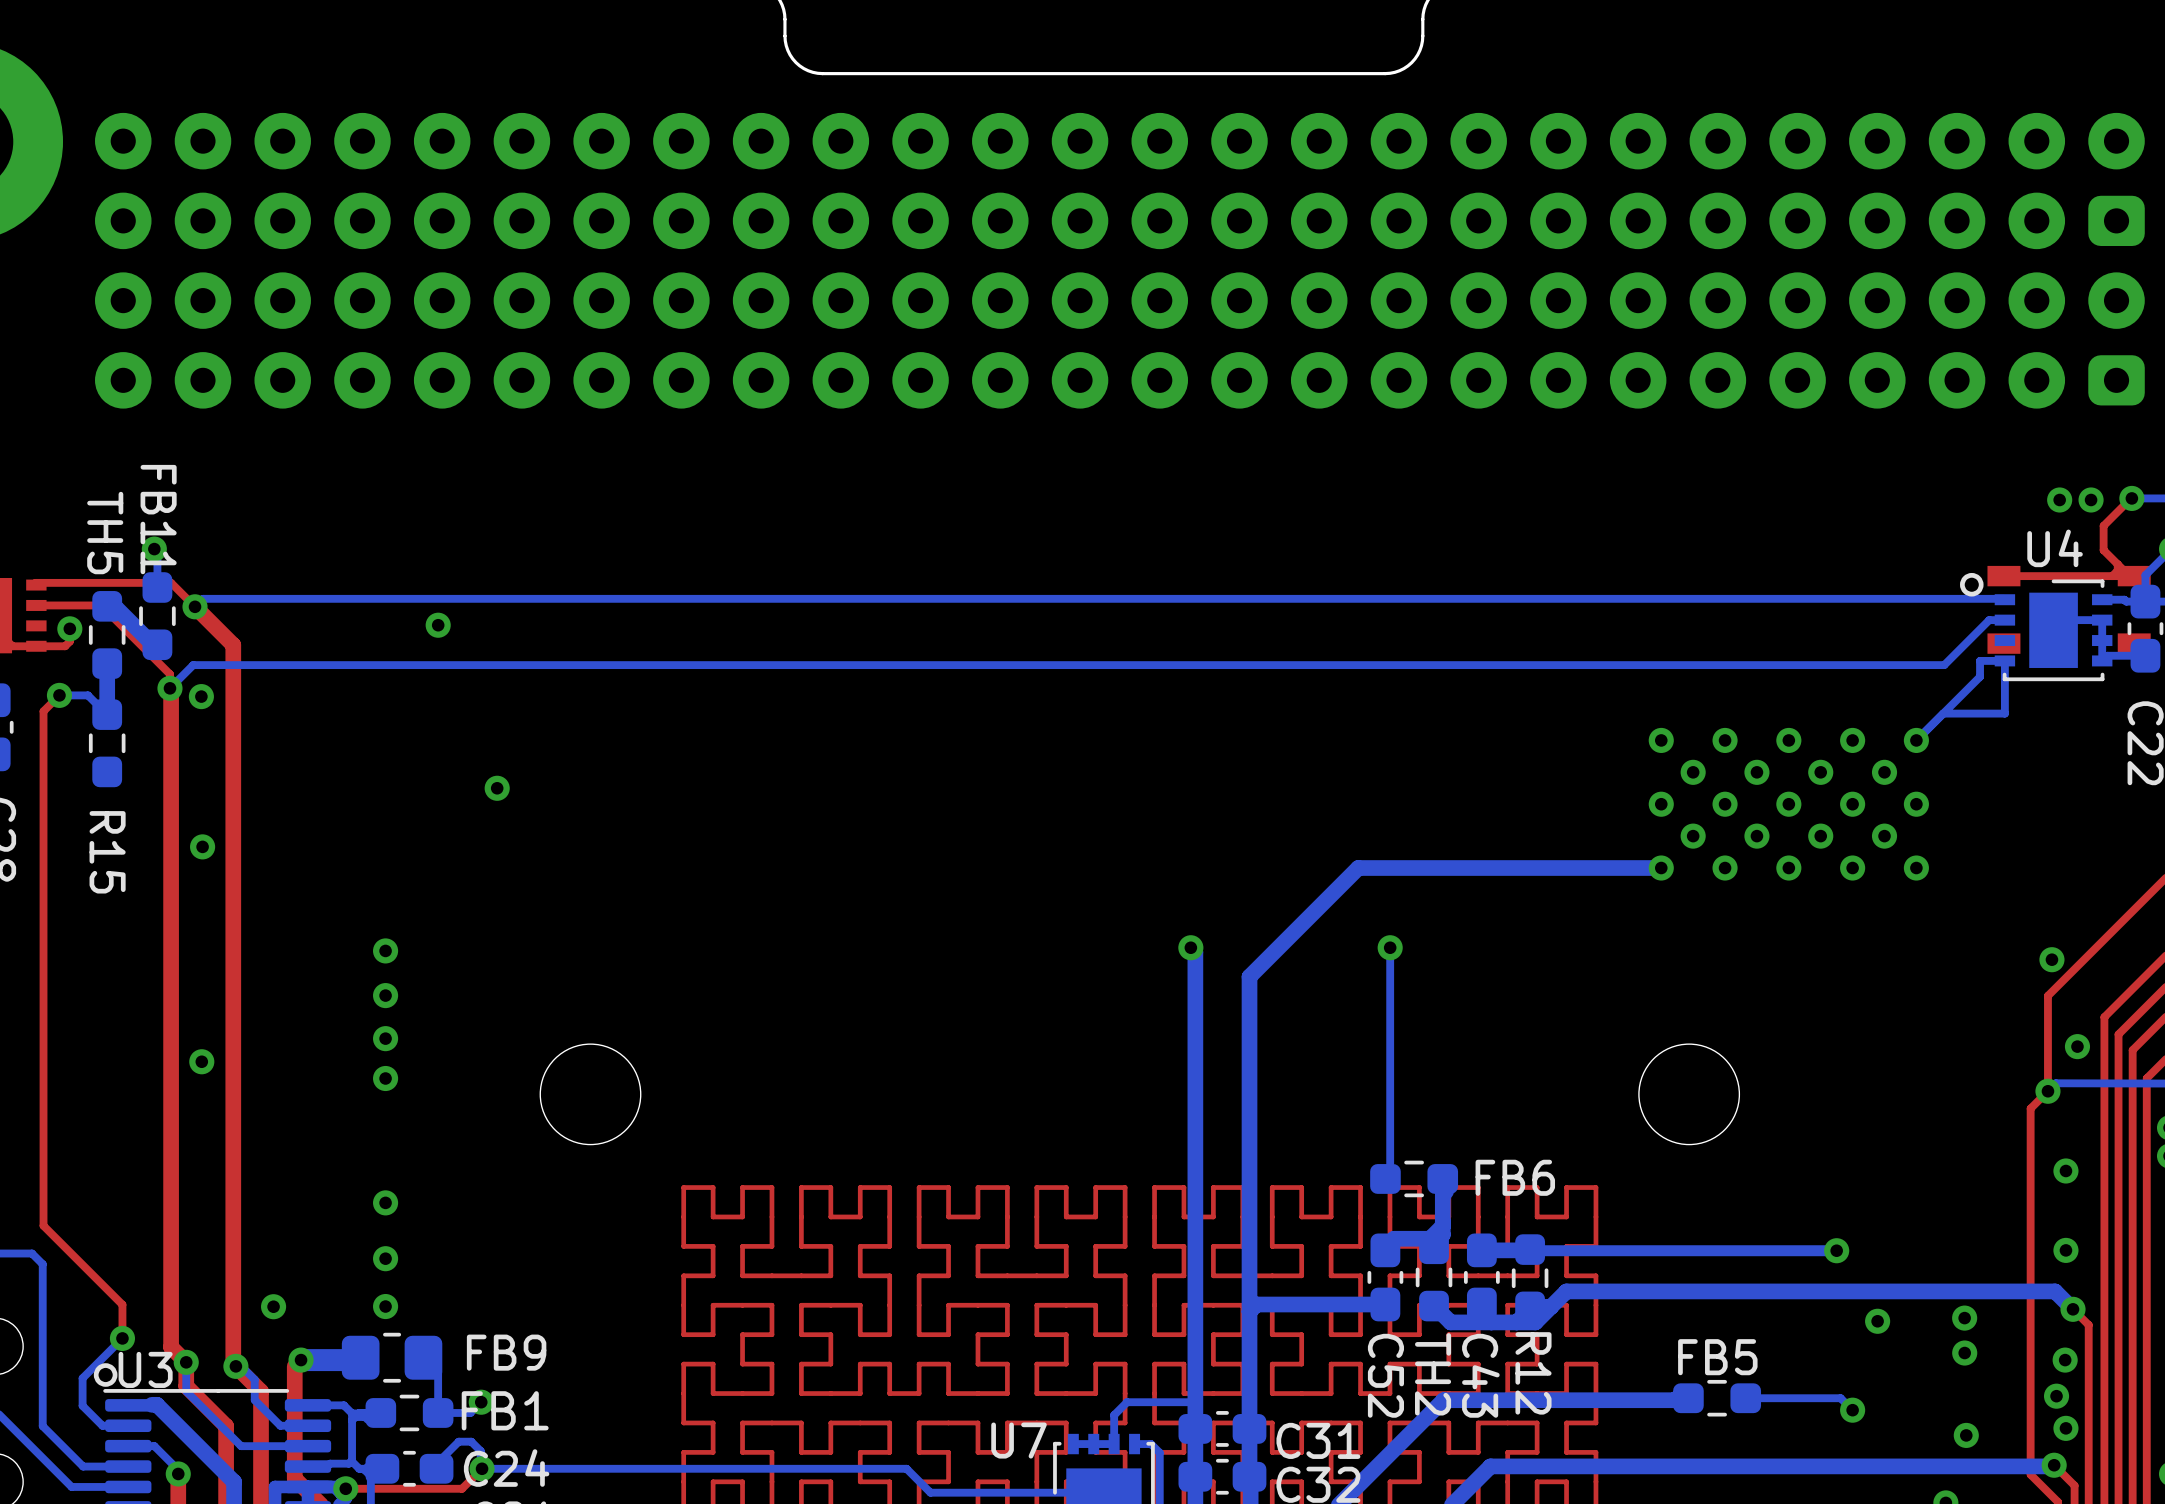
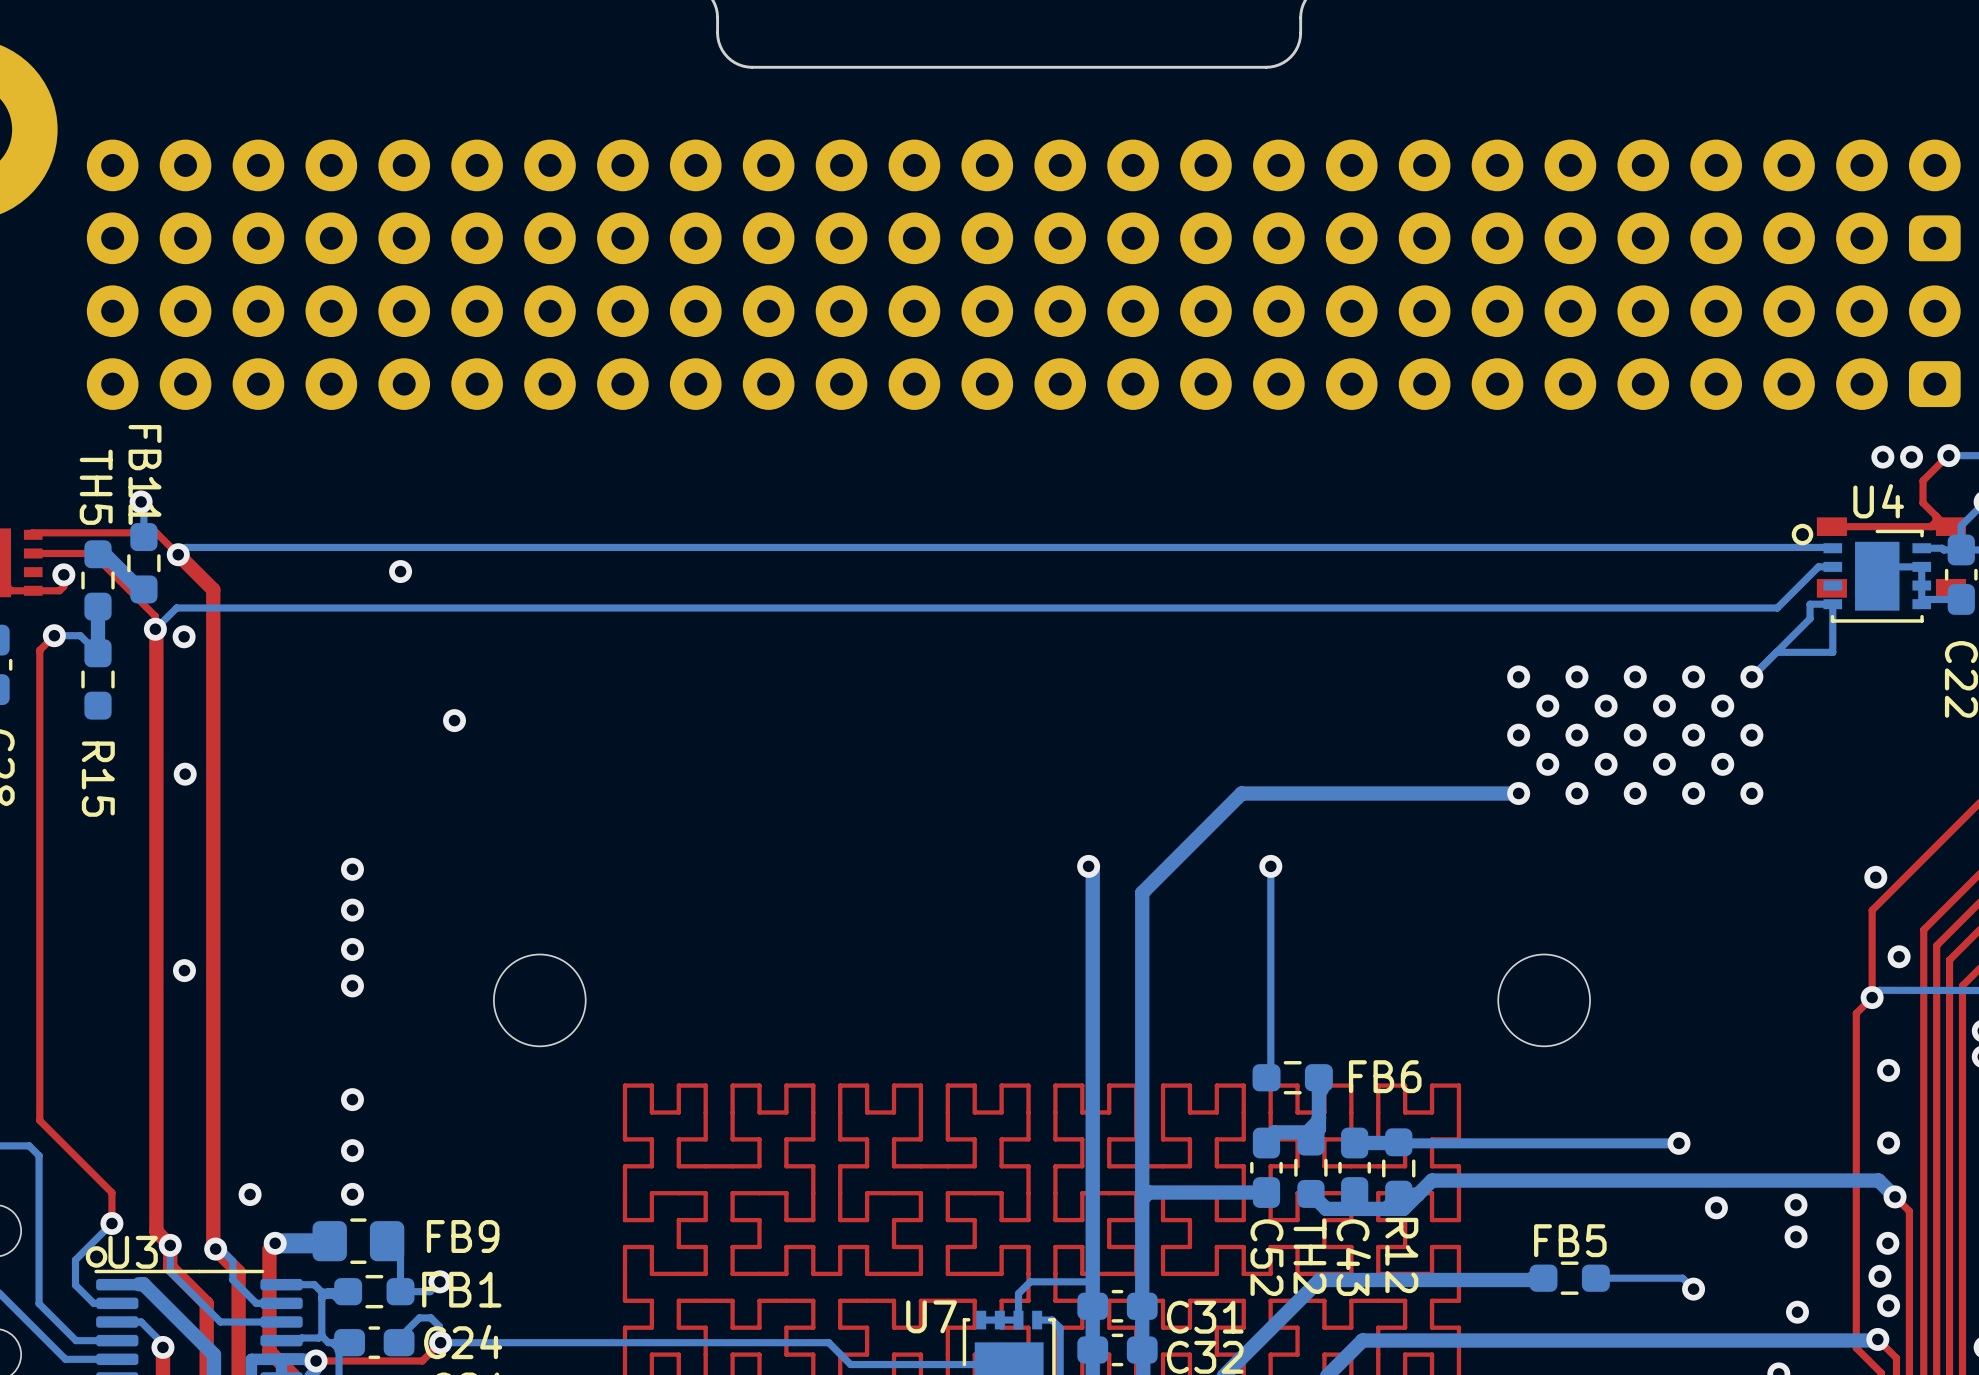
part position: (1119, 181) -> (1023, 201)
part position: (1119, 340) -> (1023, 347)

